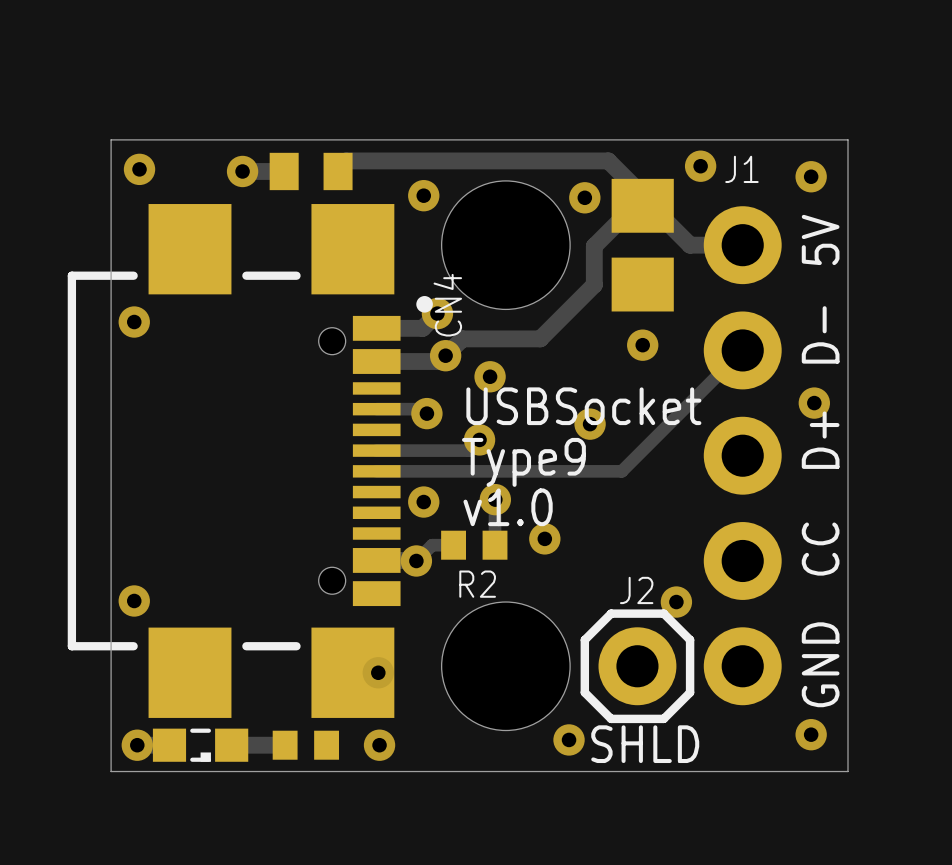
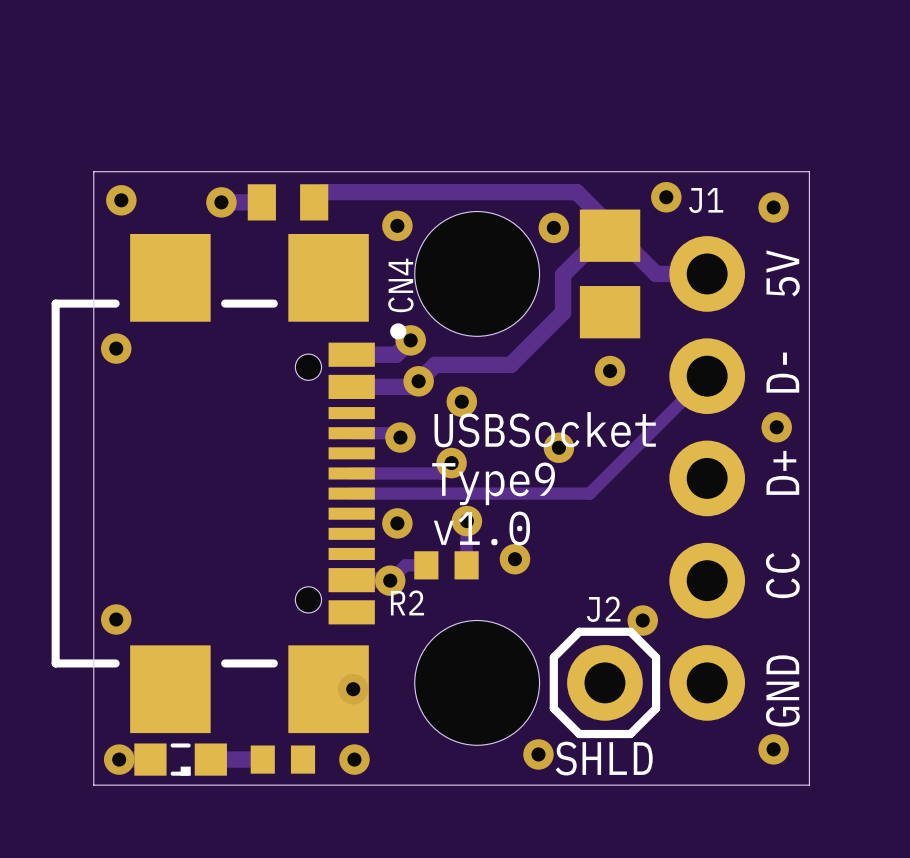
CN4 name position: CN4 (447, 305) -> CN4 (400, 285)
R2 name position: R2 (477, 584) -> R2 (407, 602)

